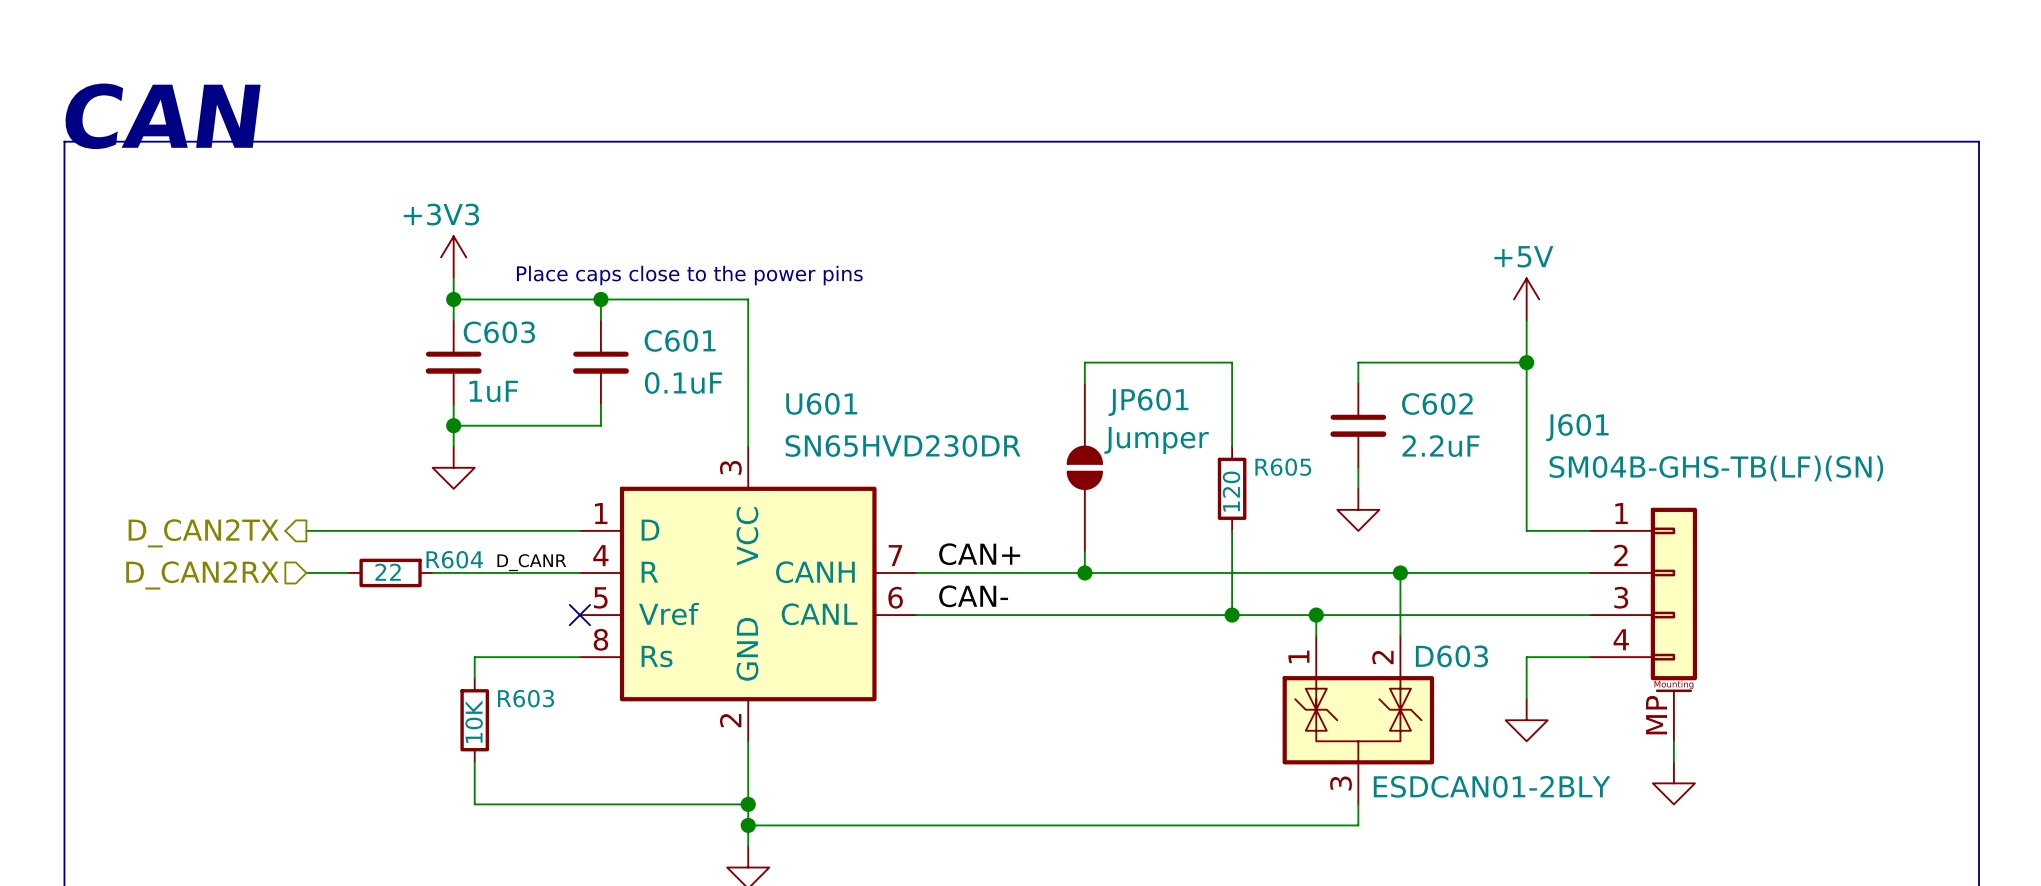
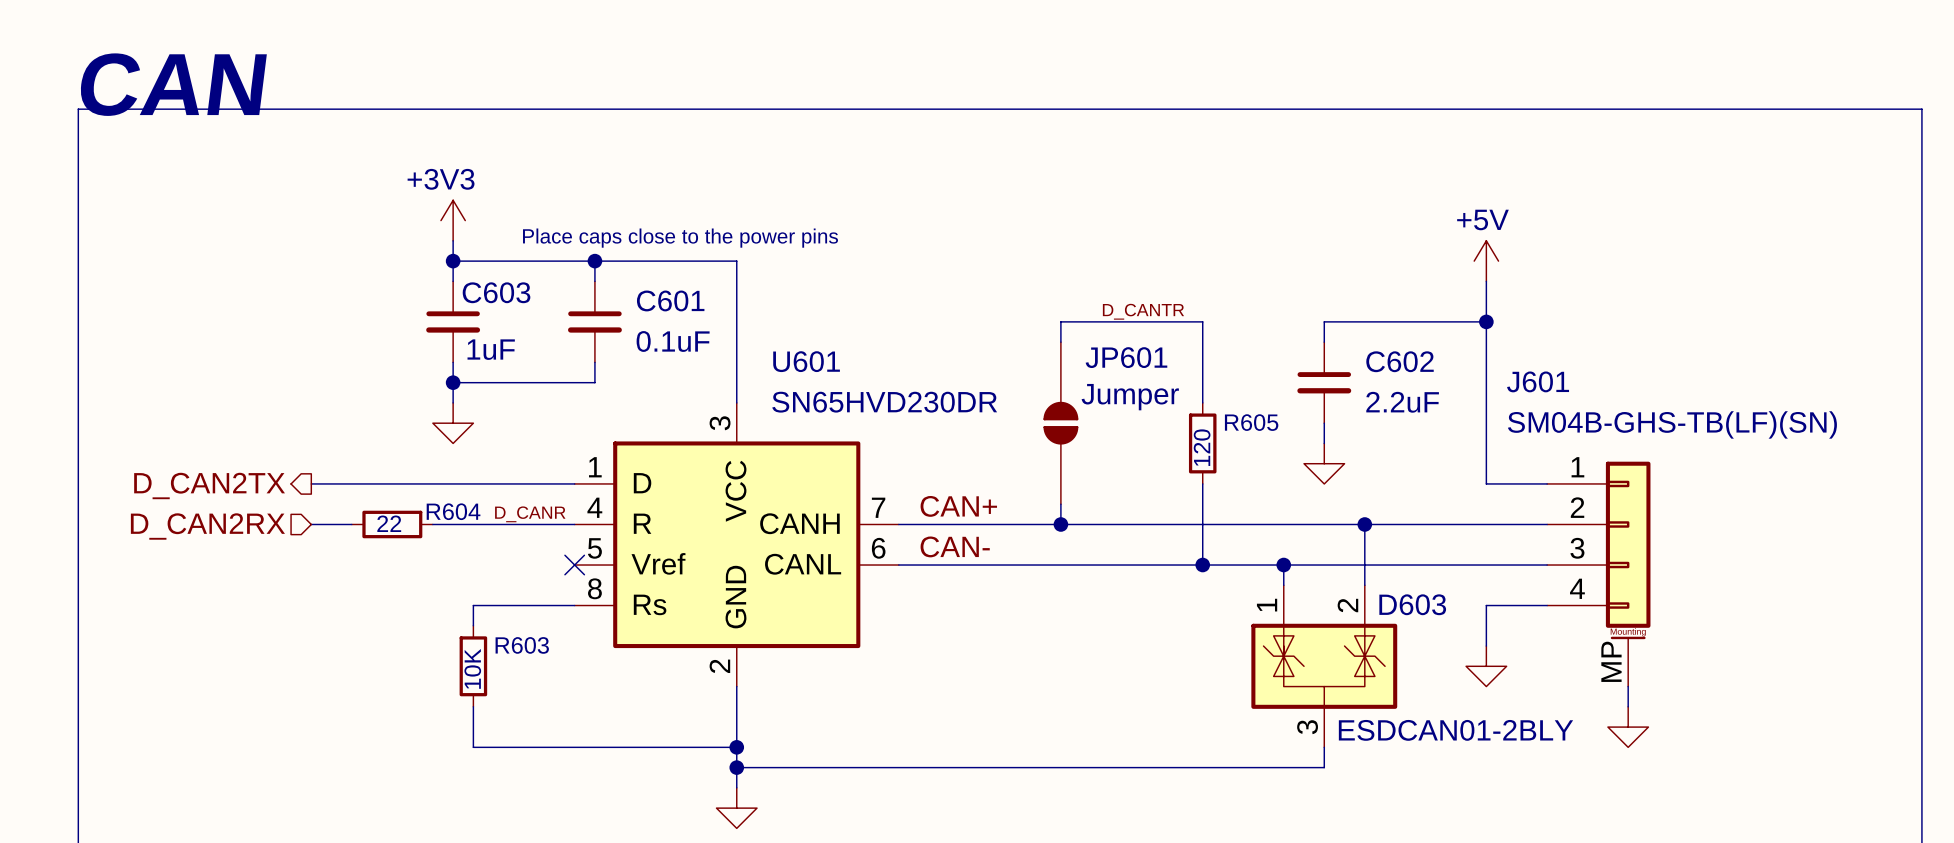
label: none -> D_CANTR (1143, 311)

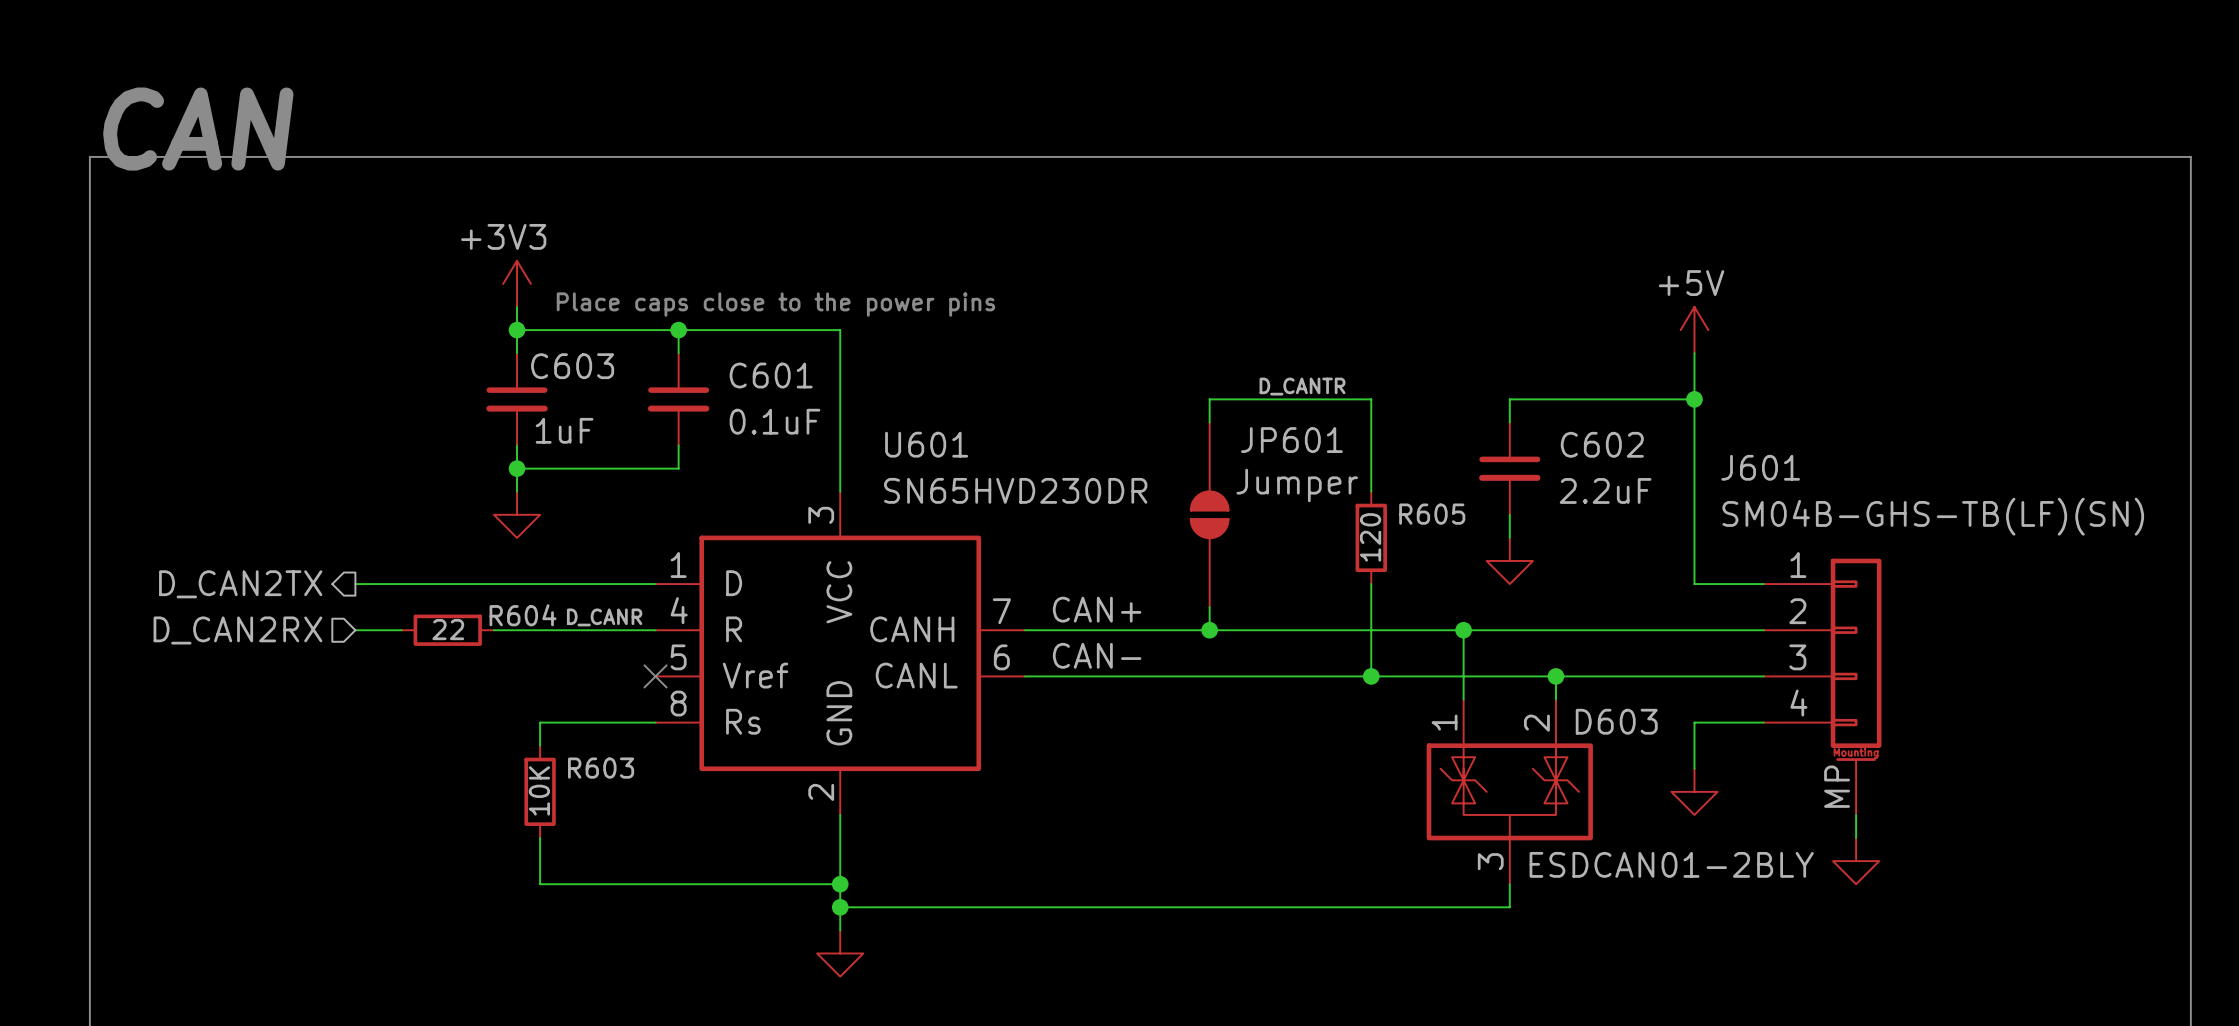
junction: none -> (1463, 630)
wire: (1364, 524) (1364, 565) -> (1463, 630) (1463, 676)
junction: (1364, 524) -> none
junction: (1283, 565) -> none
junction: none -> (1555, 676)

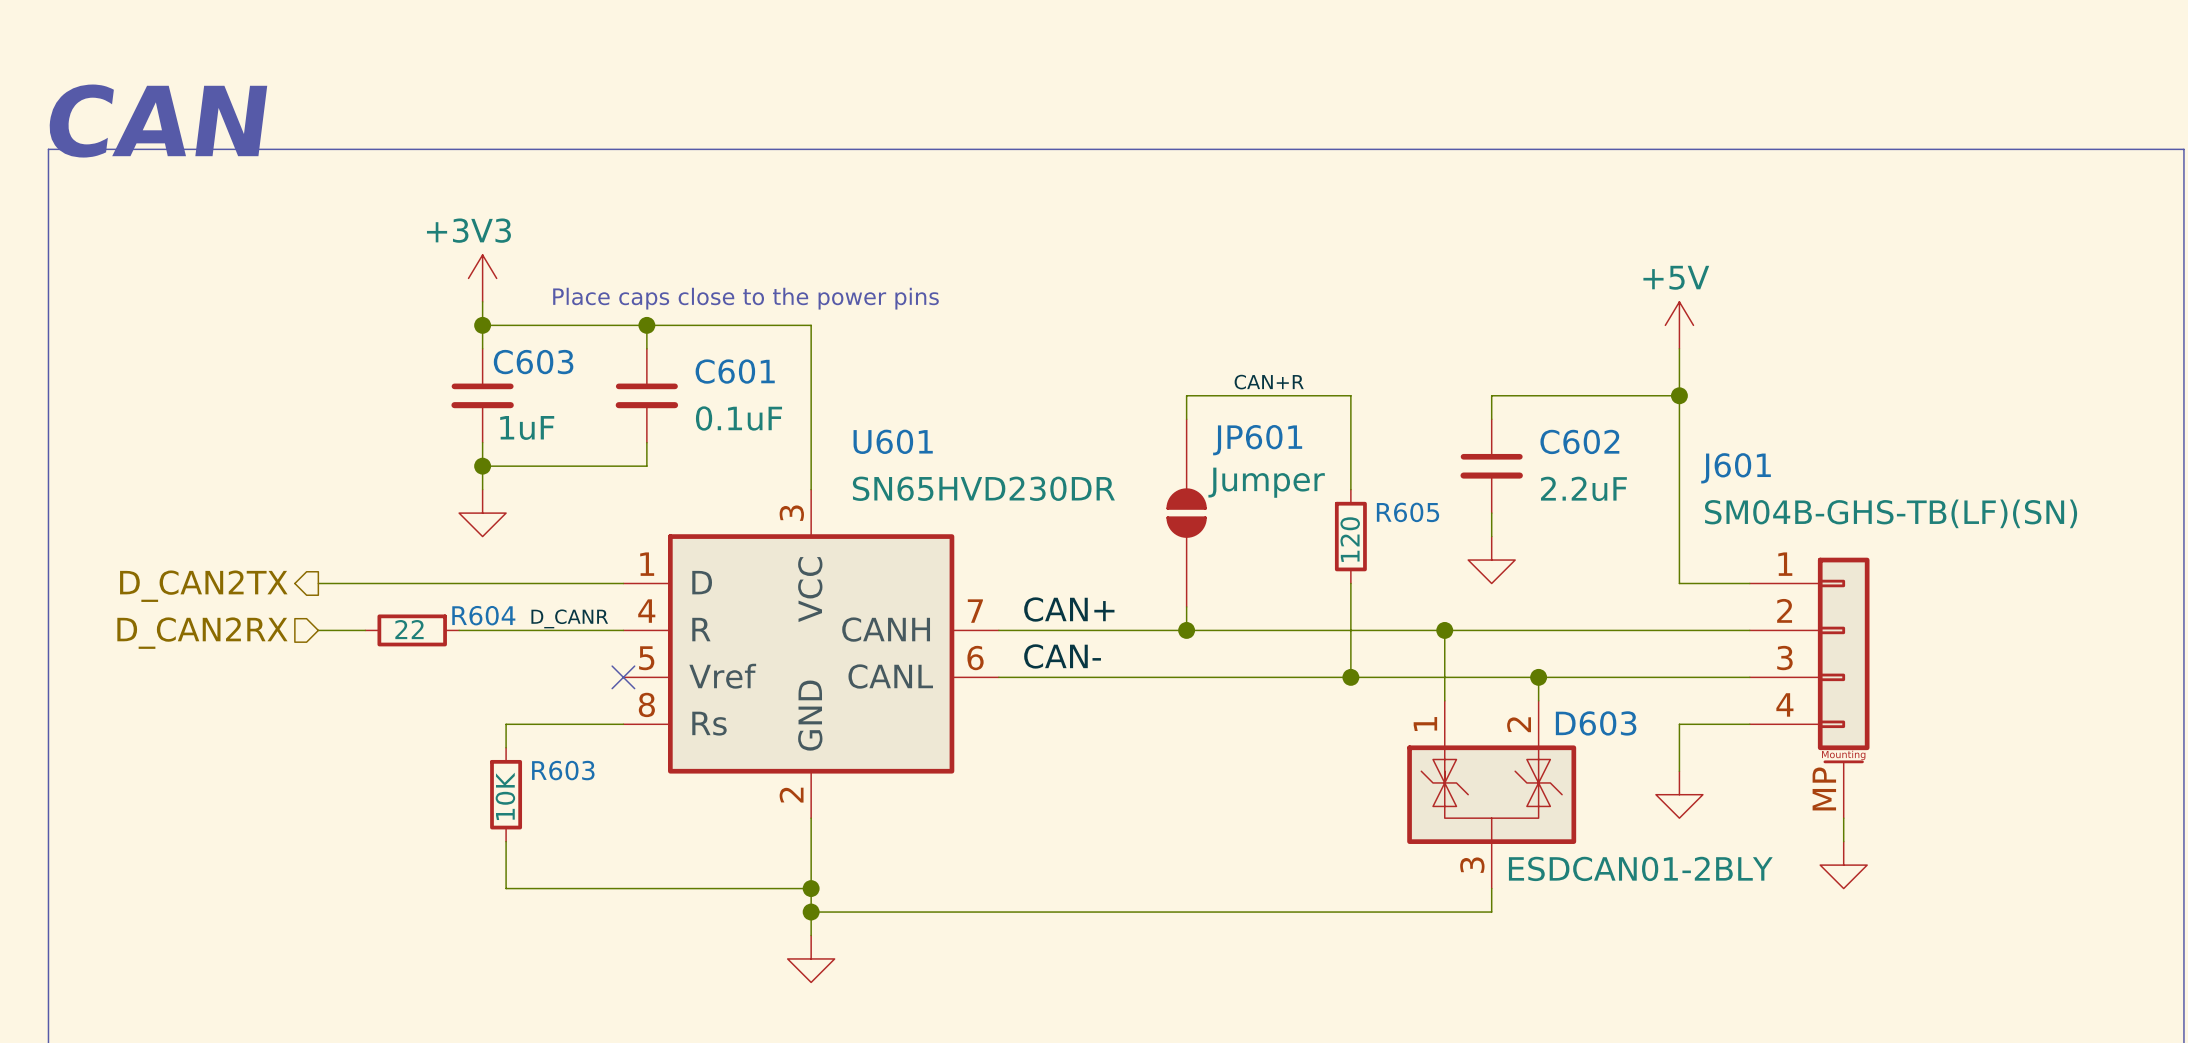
label: D_CANTR (1302, 386) -> CAN+R (1269, 382)

